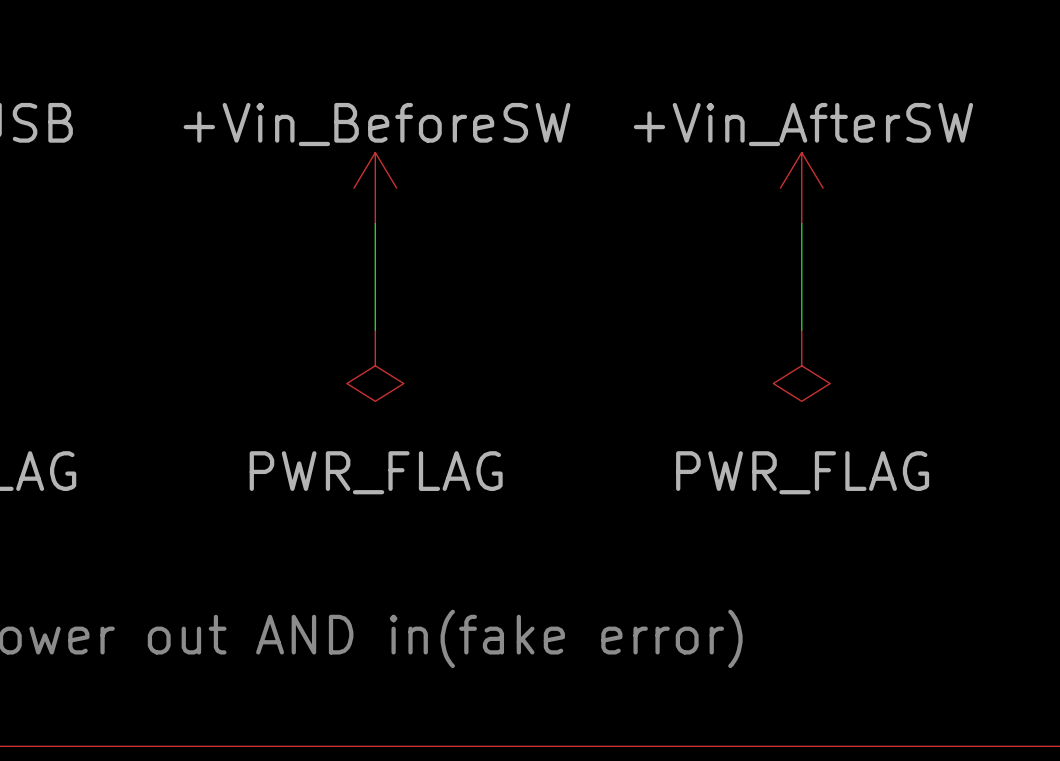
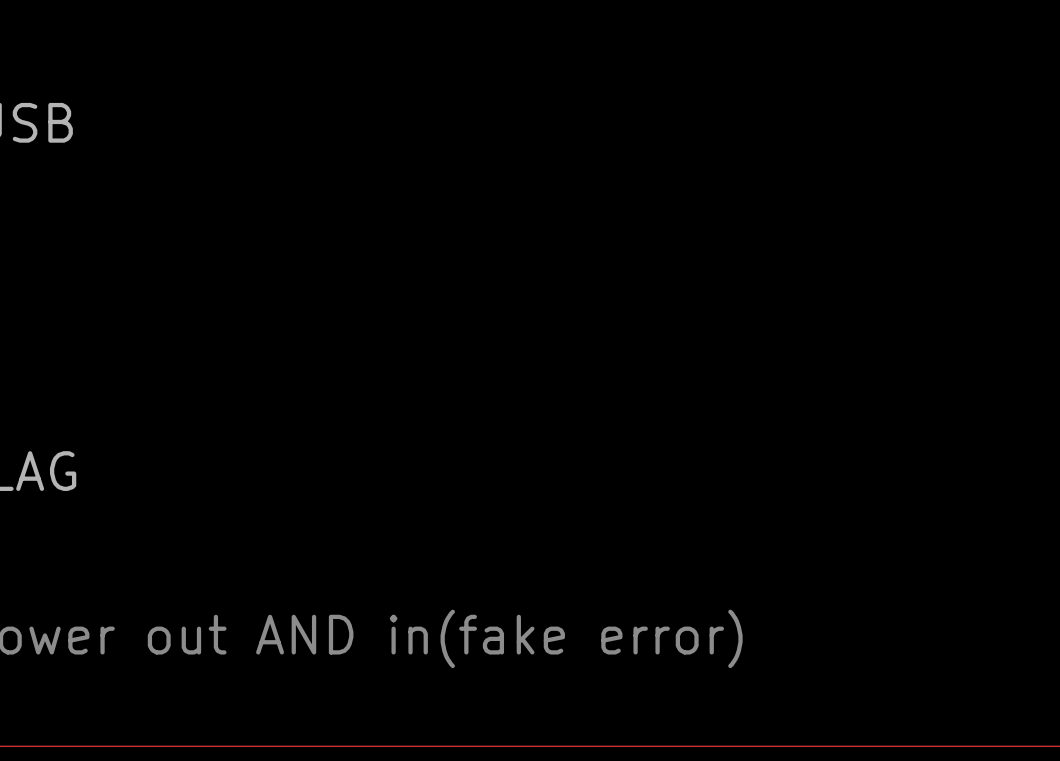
power symbol: +Vin_BeforeSW (375, 188) -> none
power symbol: +Vin_AfterSW (801, 188) -> none
wire: (375, 223) (375, 330) -> none
wire: (801, 223) (801, 330) -> none
power symbol: PWR_FLAG (375, 365) -> none
power symbol: PWR_FLAG (801, 365) -> none

